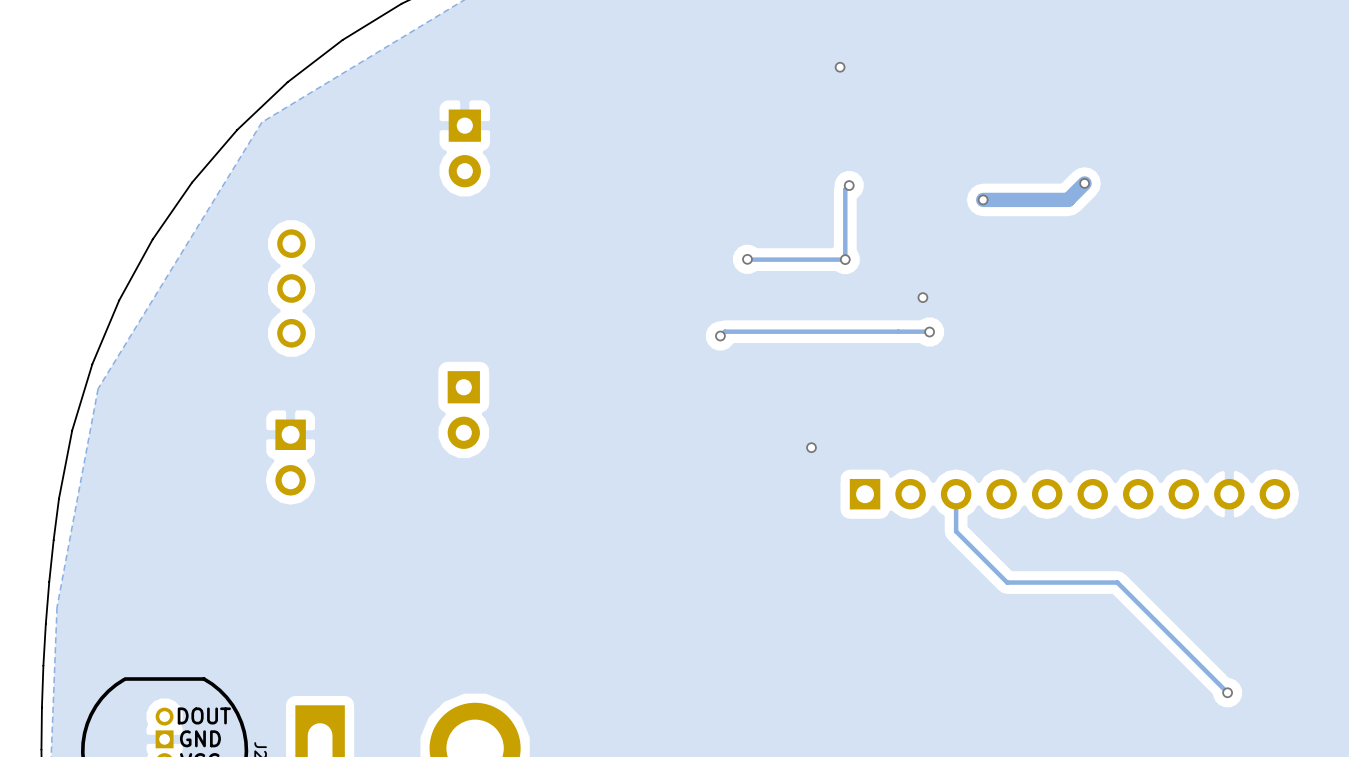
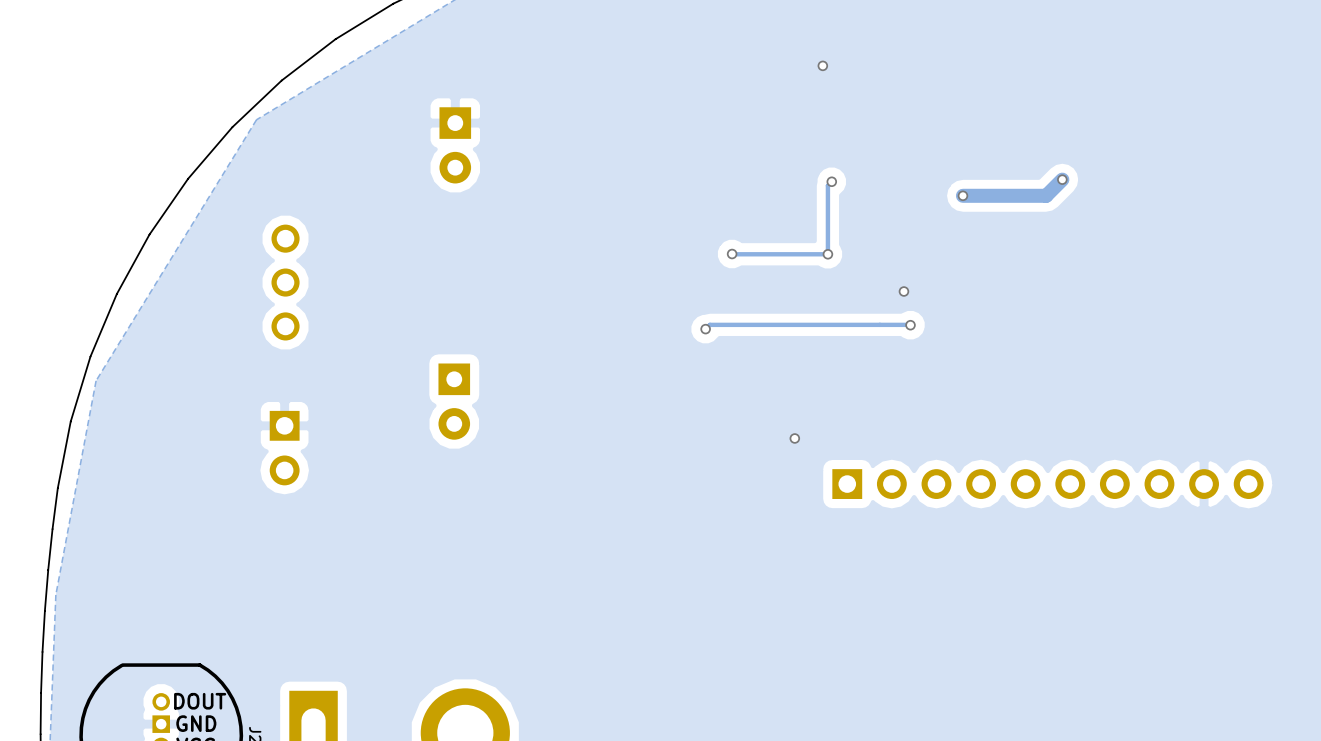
track: (956, 494) (956, 531) (1007, 582) (1117, 582) (1227, 692) -> none
via: (1227, 692) -> none

